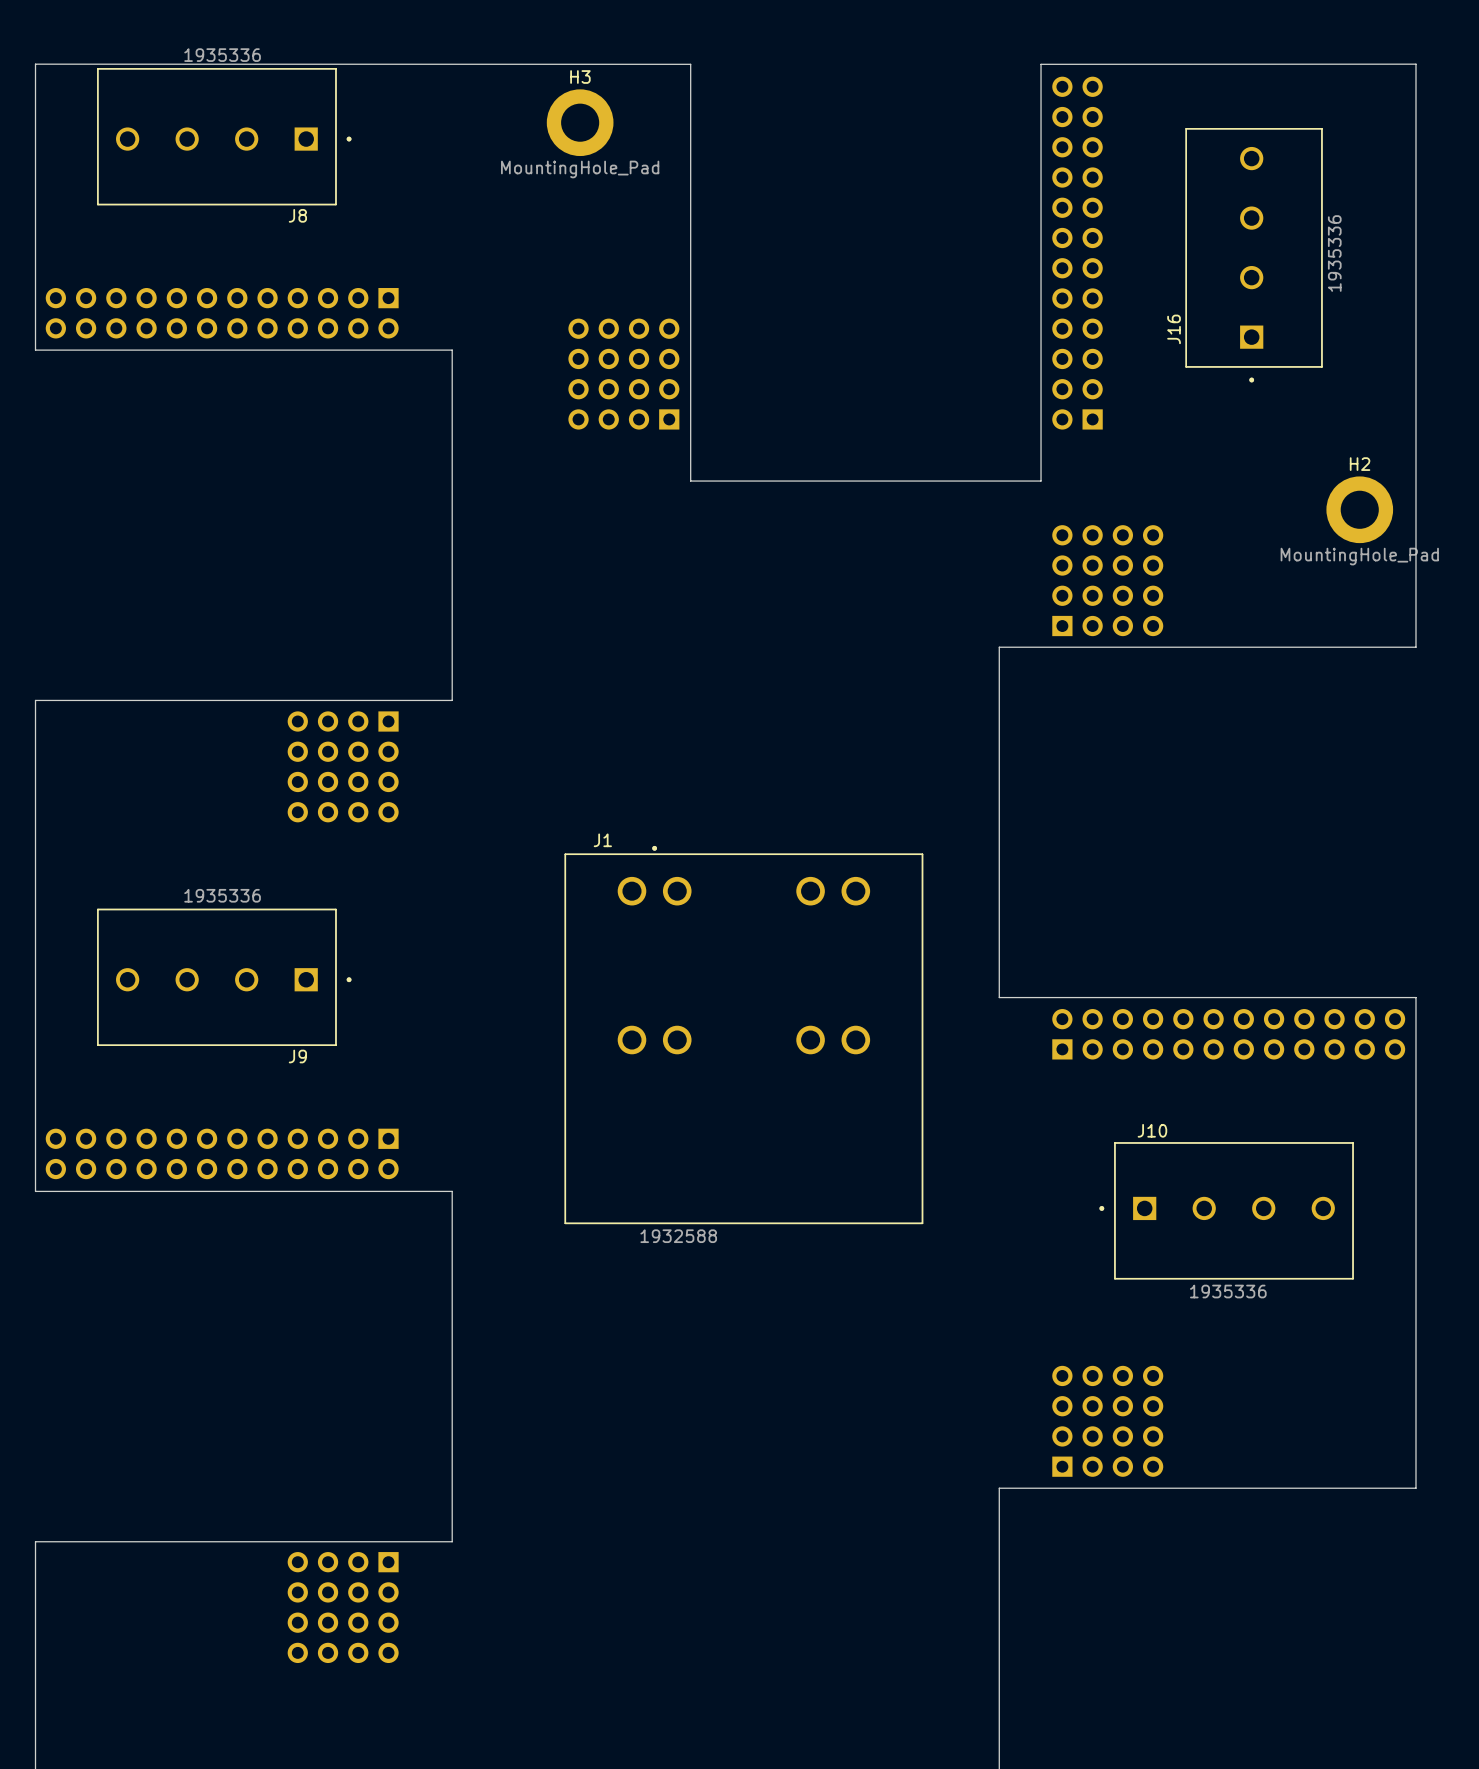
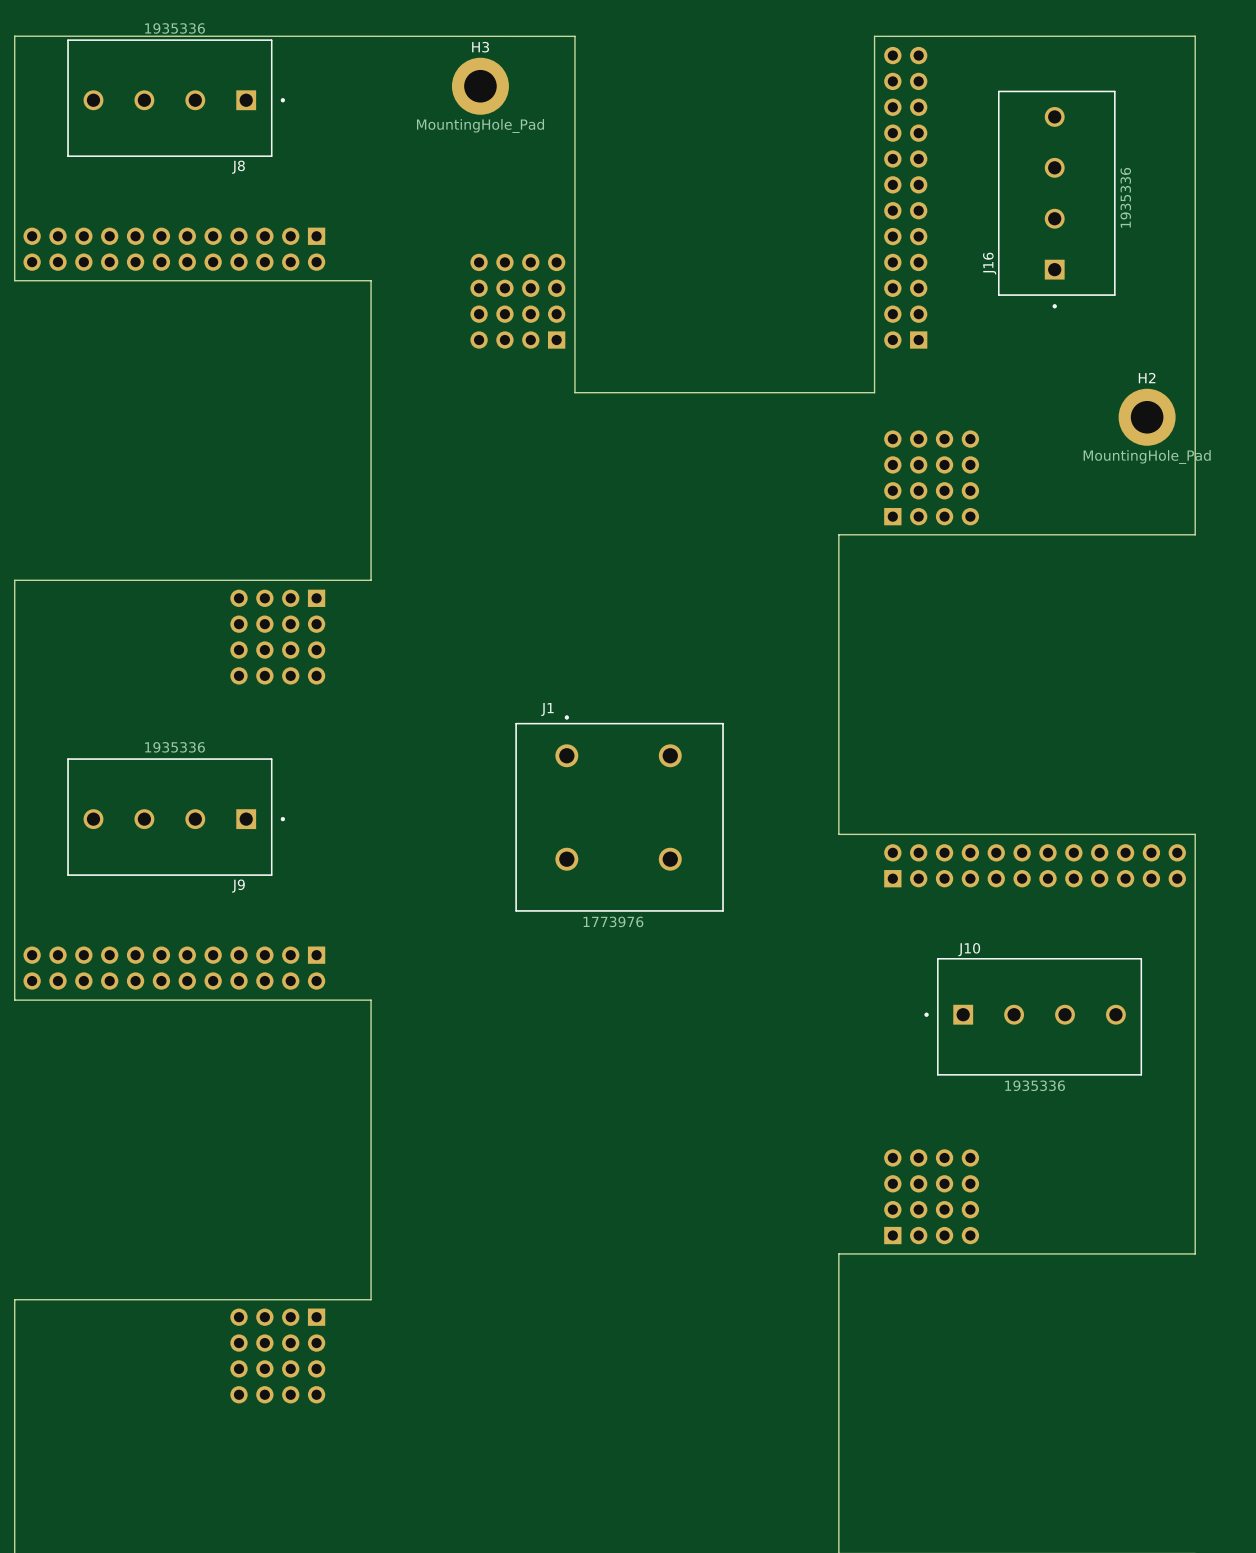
J1 name position: J1 (602, 840) -> J1 (547, 709)
J1 footprint: [564, 845, 924, 1225] -> [515, 715, 724, 912]
J1 value: 1932588 (678, 1236) -> 1773976 (613, 921)

